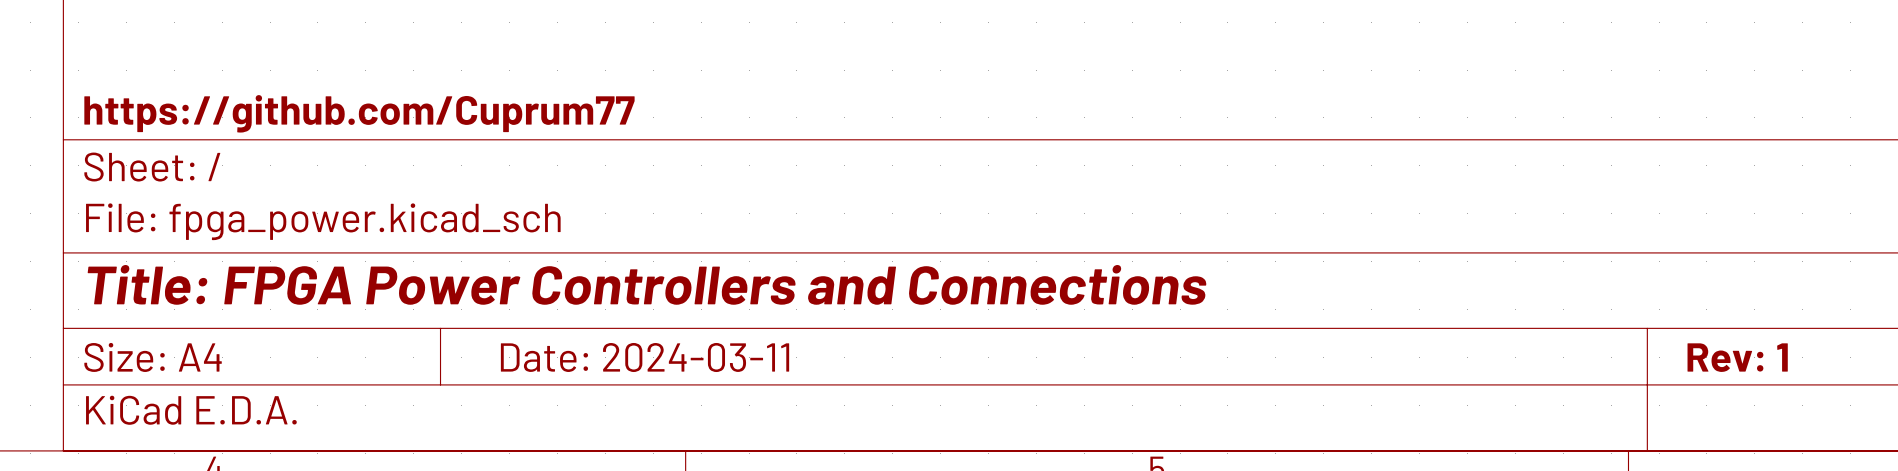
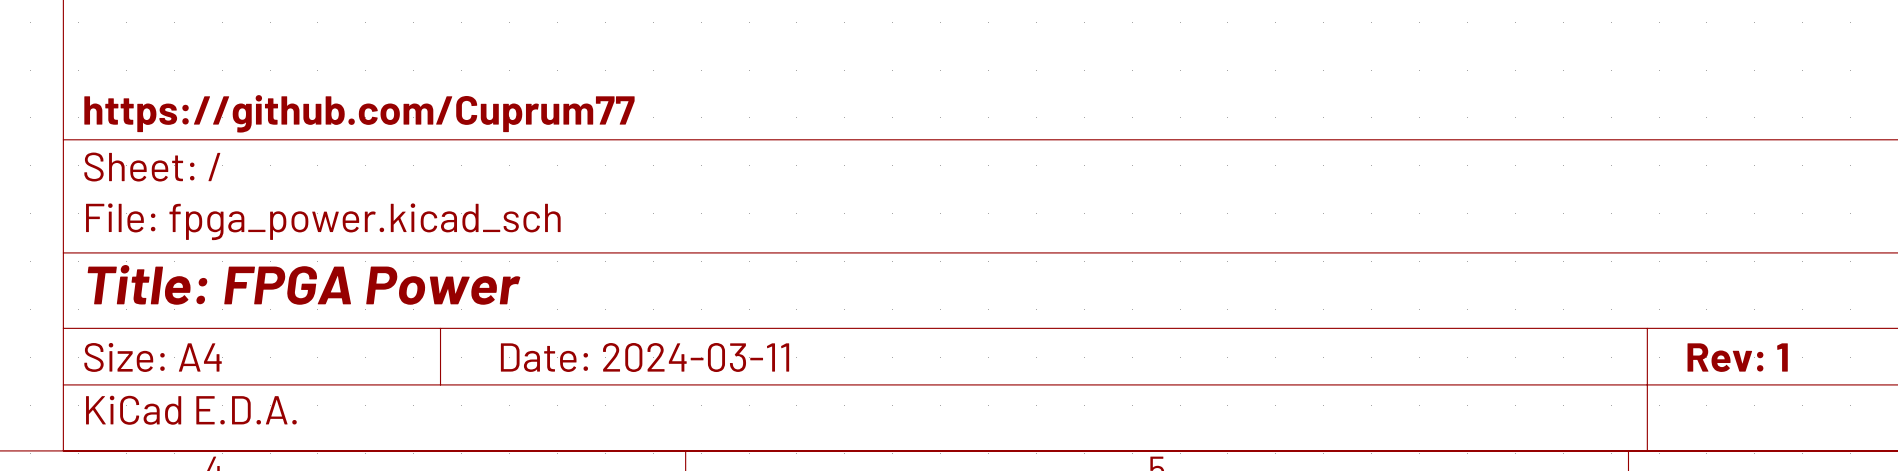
title block: Title: FPGA Power Controllers and Connections (647, 284) -> Title: FPGA Power (304, 284)

